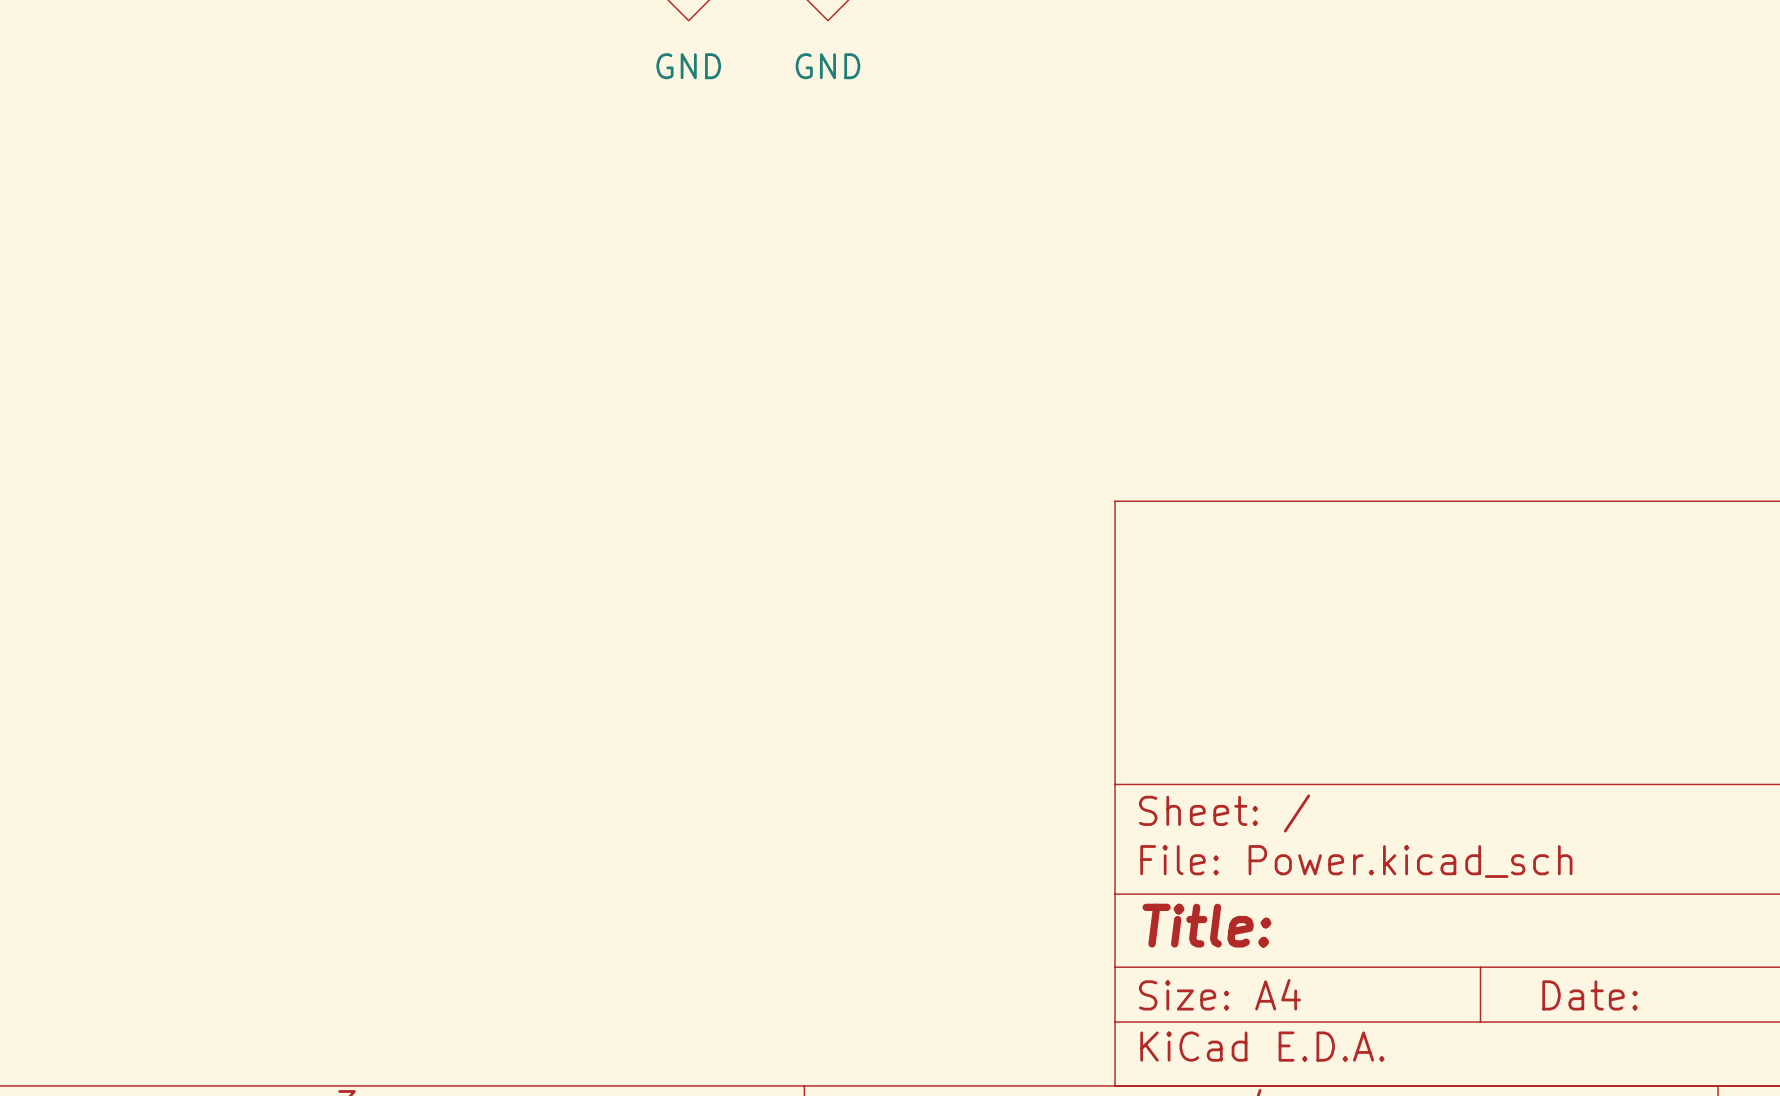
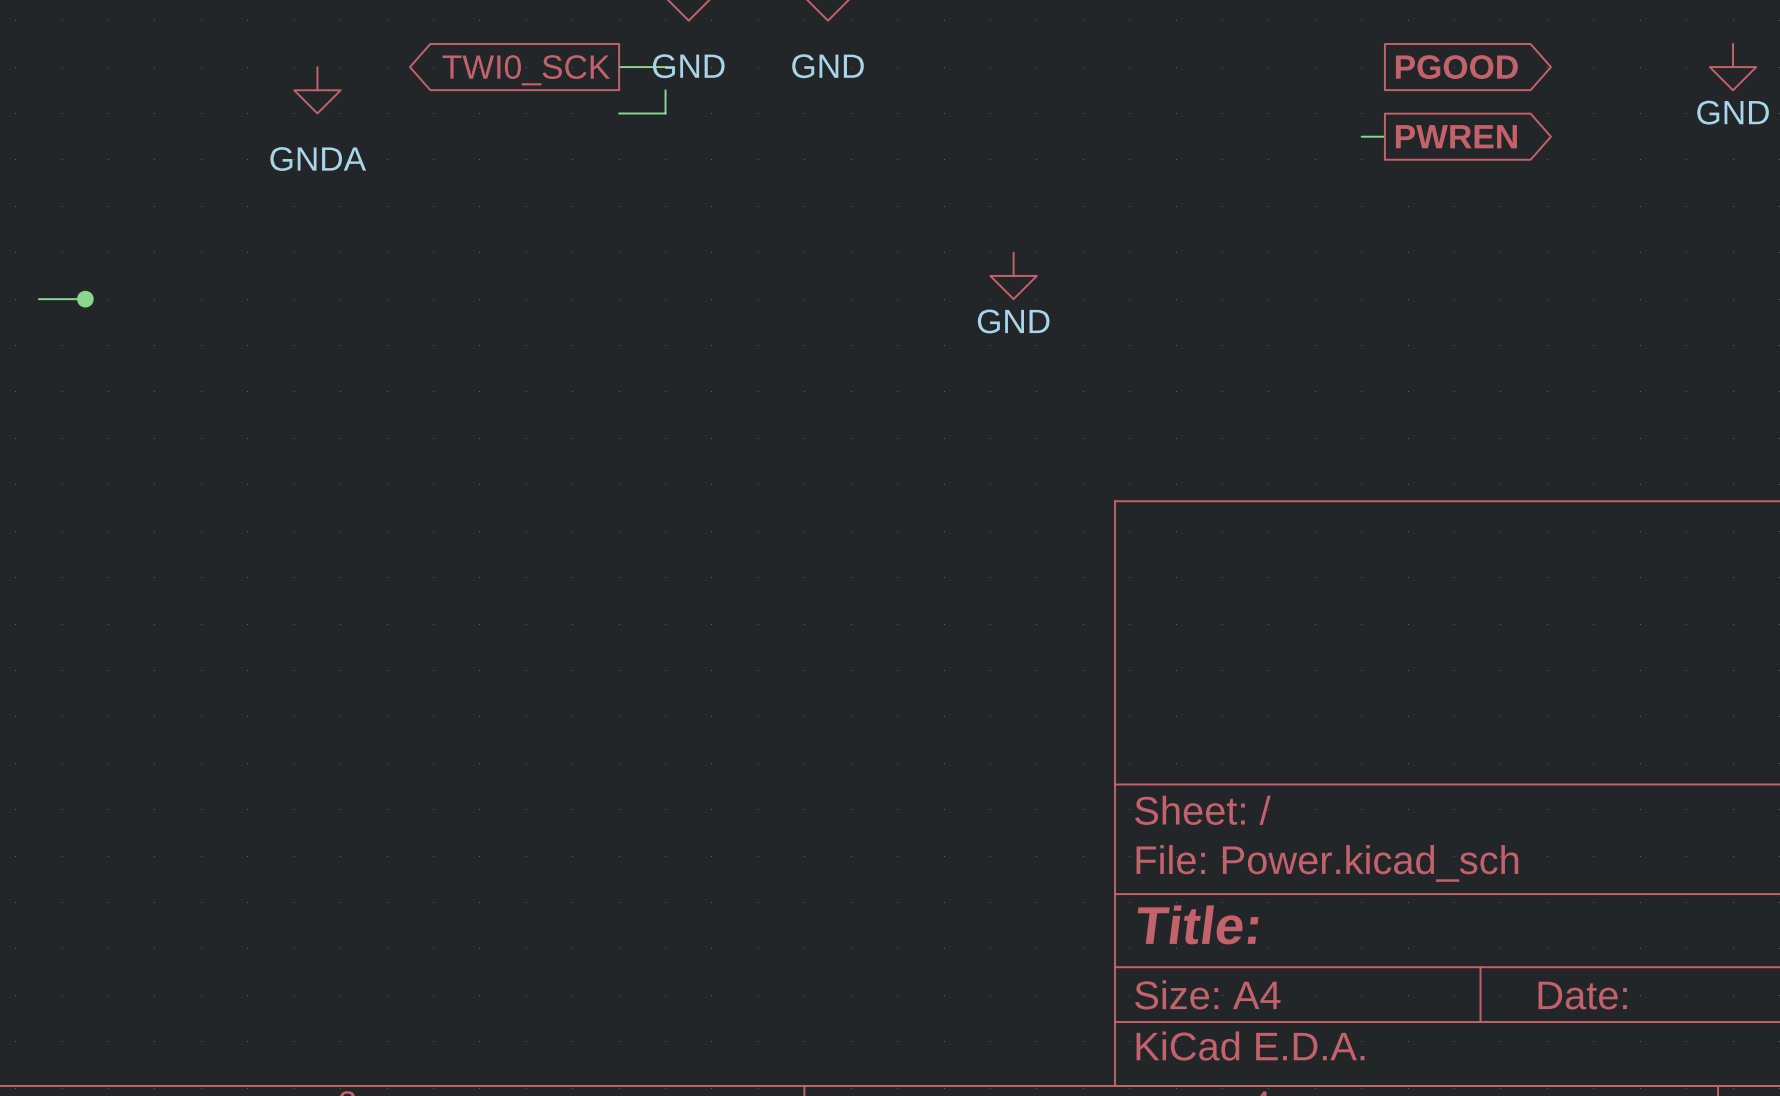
wire: none -> (619, 67) (665, 67)
global label: none -> PGOOD (1456, 67)
power symbol: none -> GND (1733, 67)
global label: none -> TWI0_SCK (526, 70)
power symbol: none -> GNDA (317, 90)
wire: none -> (665, 90) (665, 113) (619, 113)
wire: none -> (1361, 136) (1384, 136)
global label: none -> PWREN (1456, 136)
power symbol: none -> GND (1013, 275)
wire: none -> (38, 299) (85, 299)
junction: none -> (85, 299)

